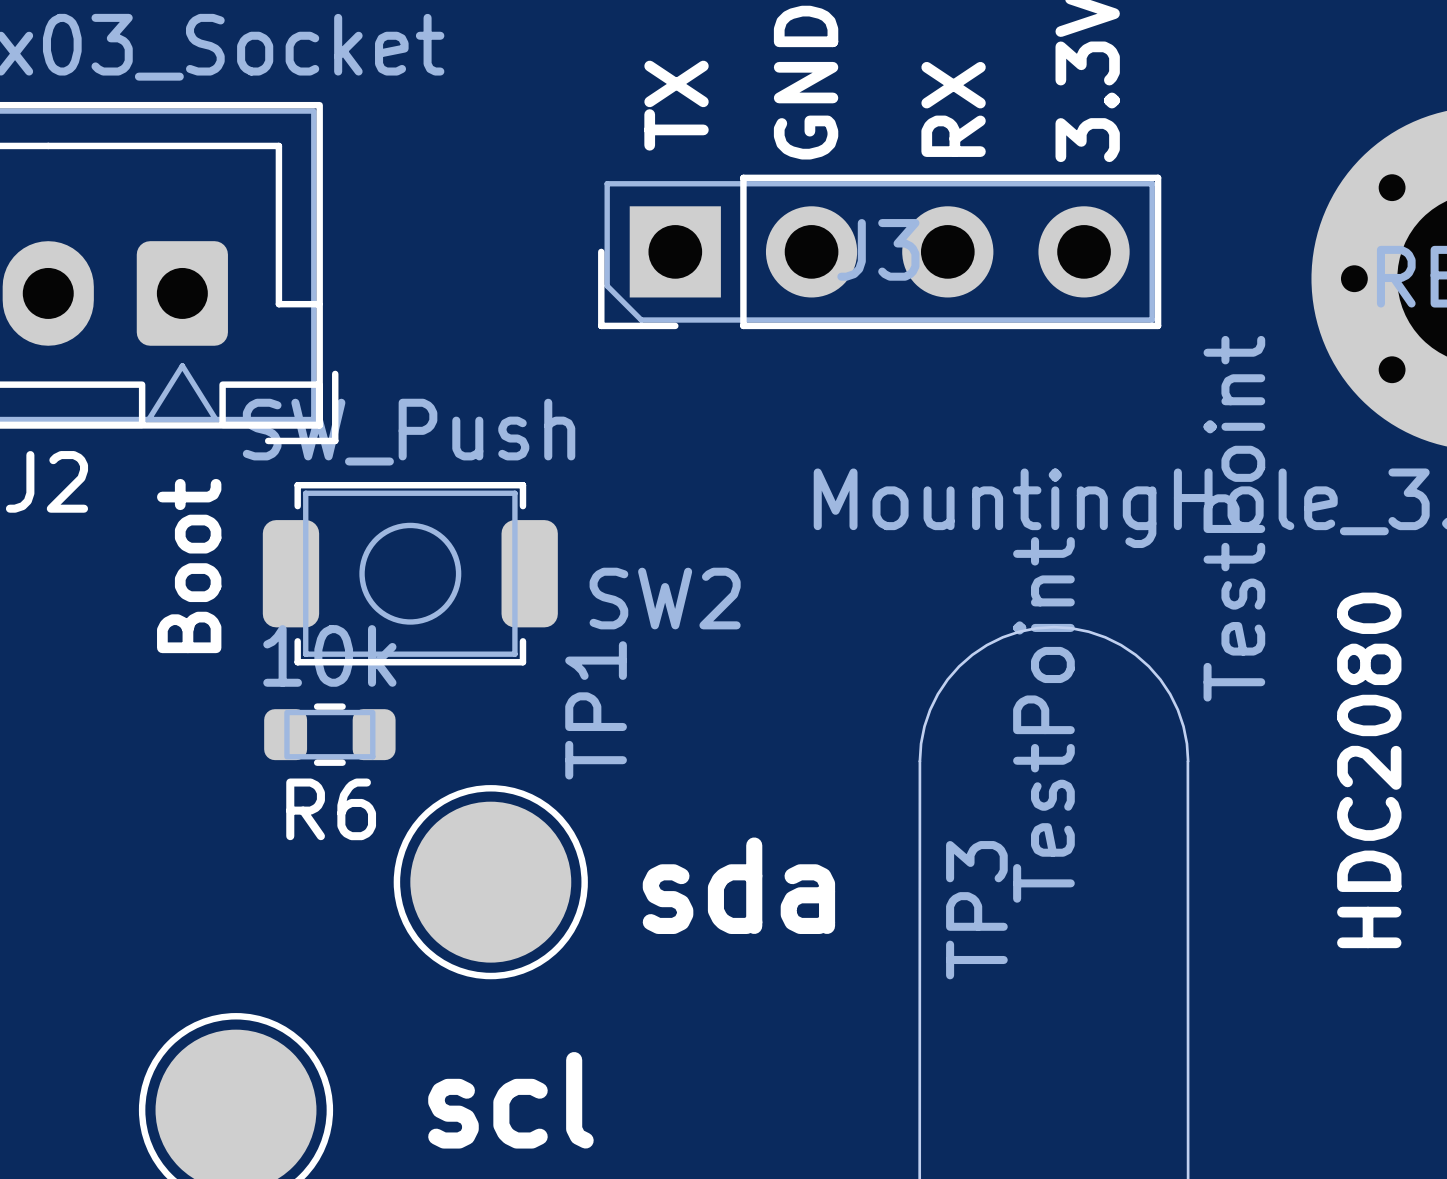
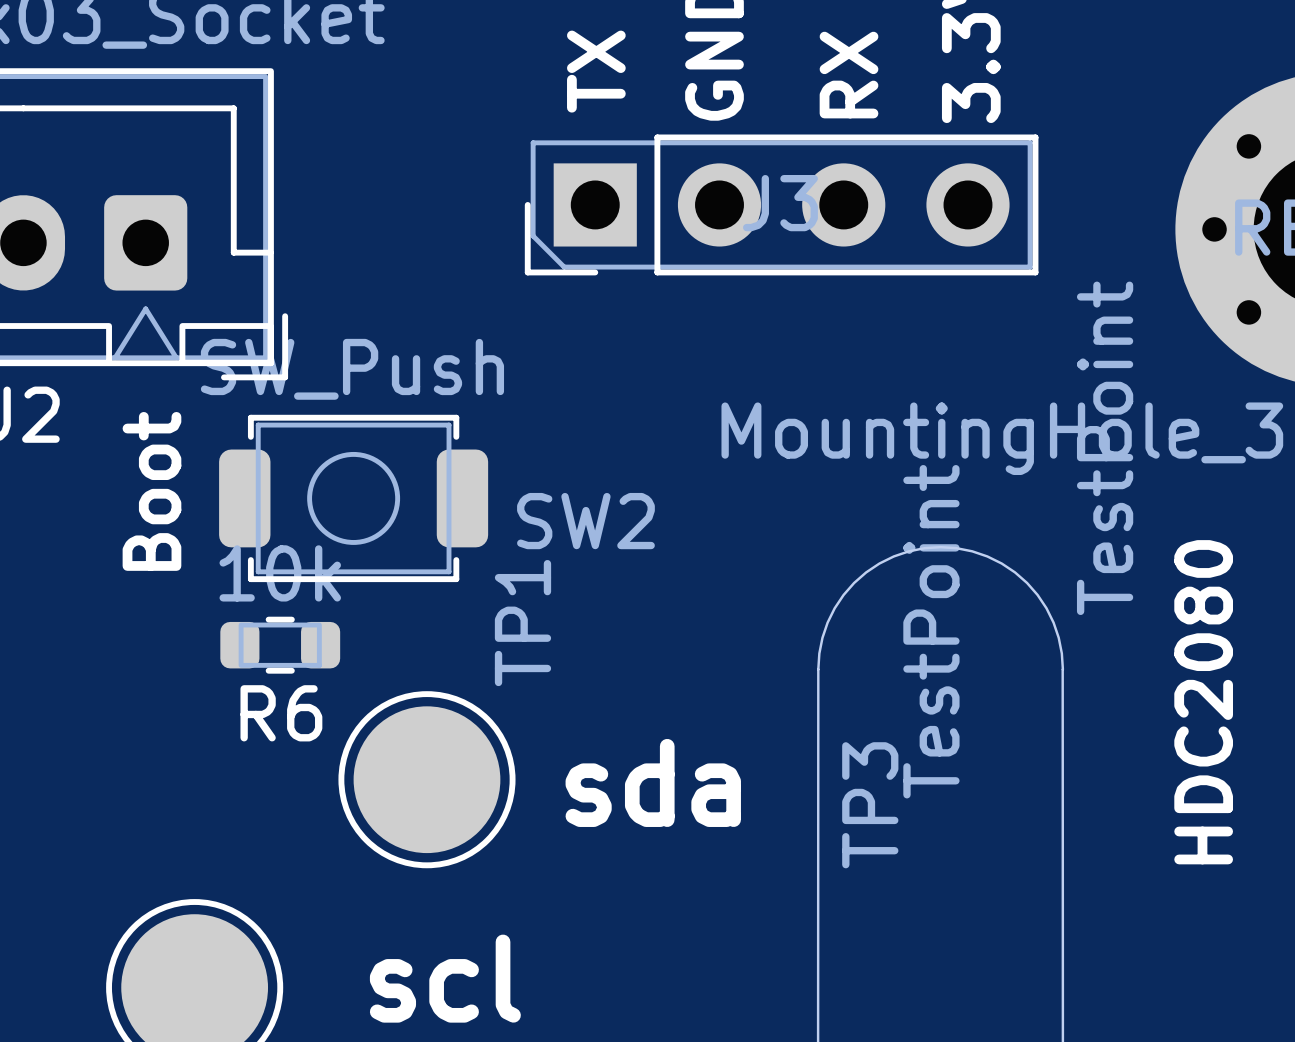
text position: HDC2080 (1369, 770) -> HDC2080 (1203, 702)

